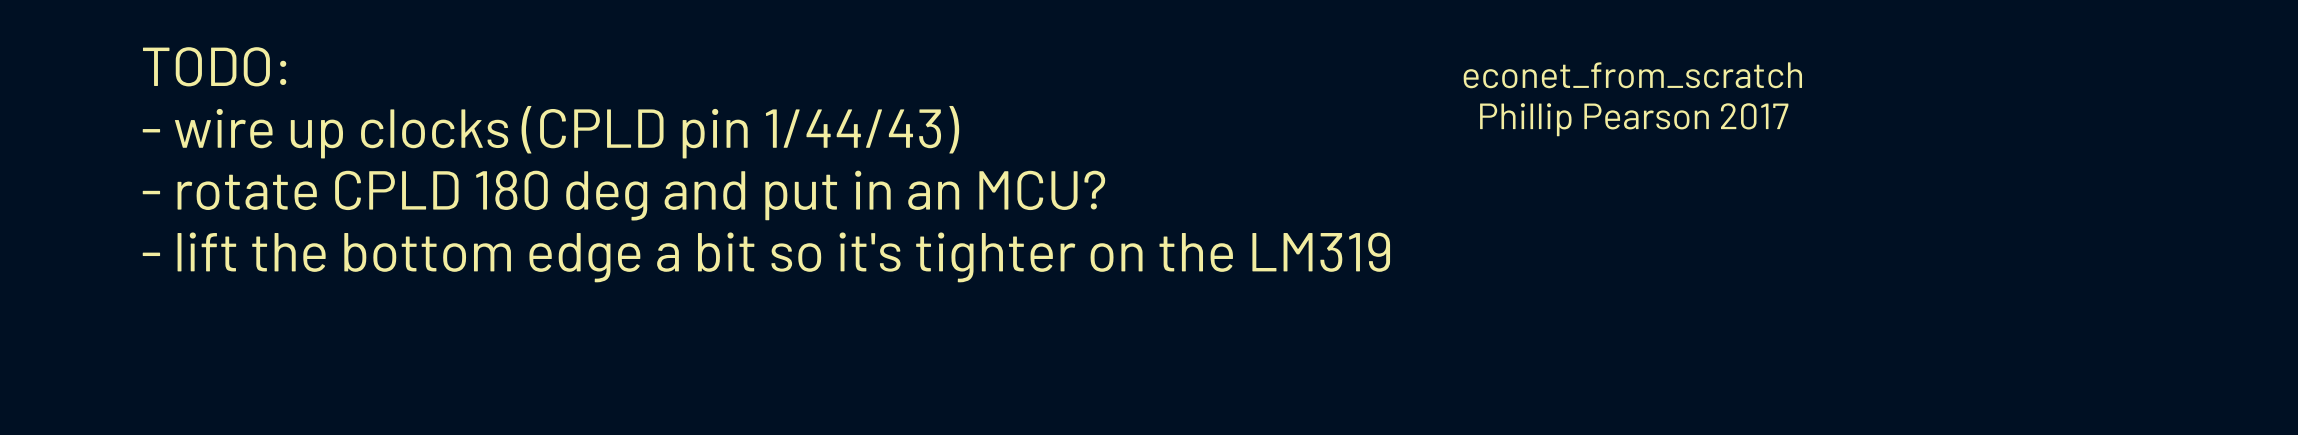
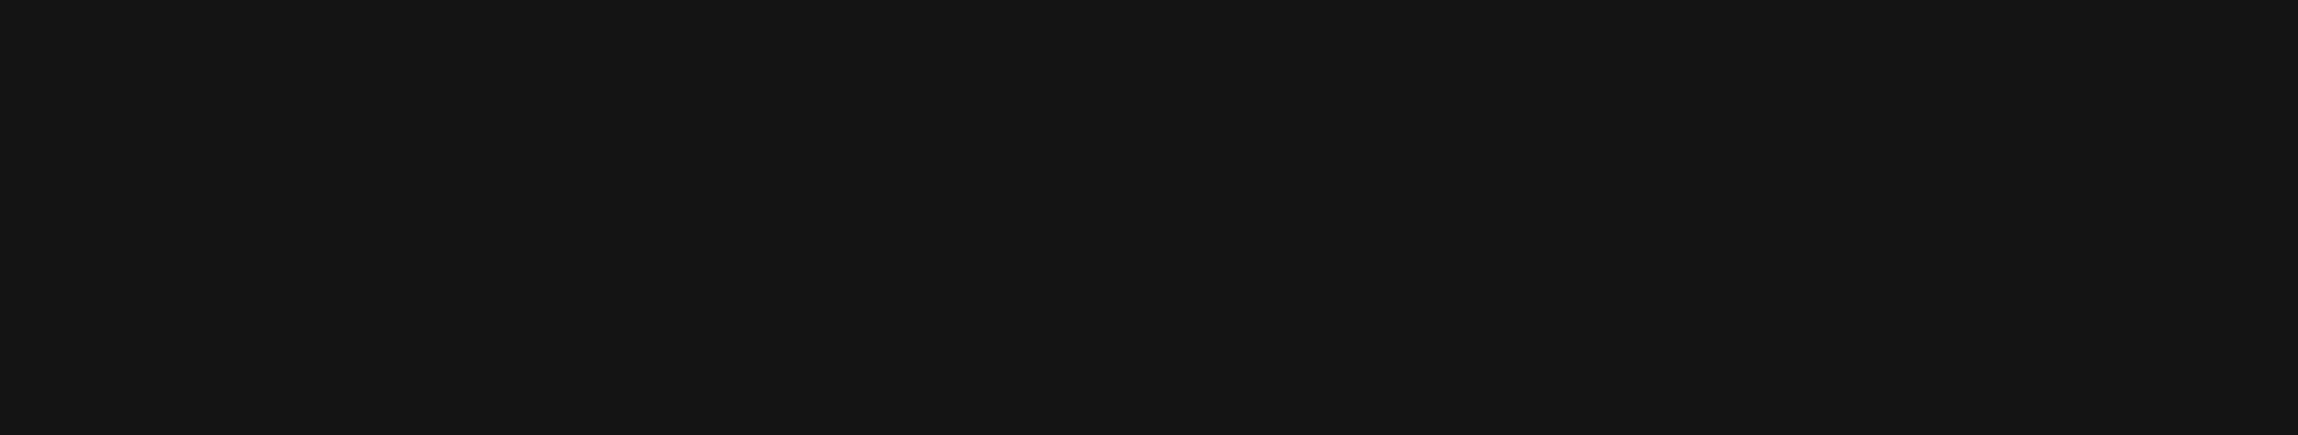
text: TODO: (214, 66) -> none
text: econet_from_scratch (1632, 75) -> none
text: Phillip Pearson 2017 (1634, 119) -> none
text: - wire up clocks (CPLD pin 1/44/43) (550, 132) -> none
text: - rotate CPLD 180 deg and put in an MCU? (623, 195) -> none
text: - lift the bottom edge a bit so it's tighter on the LM319 (766, 257) -> none

